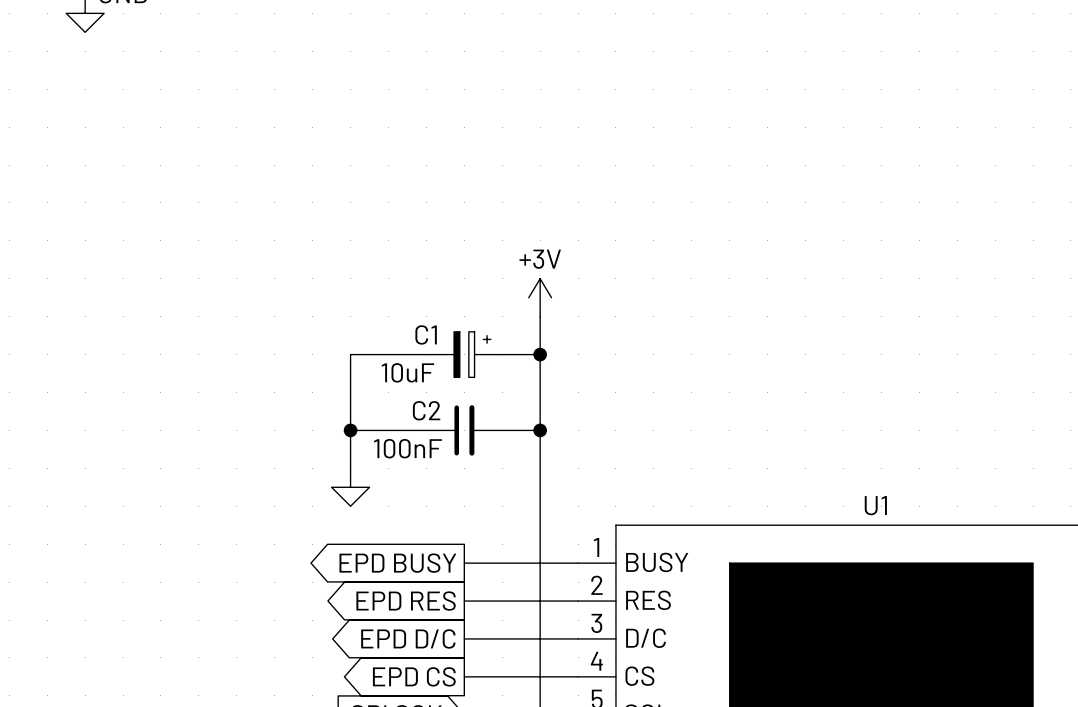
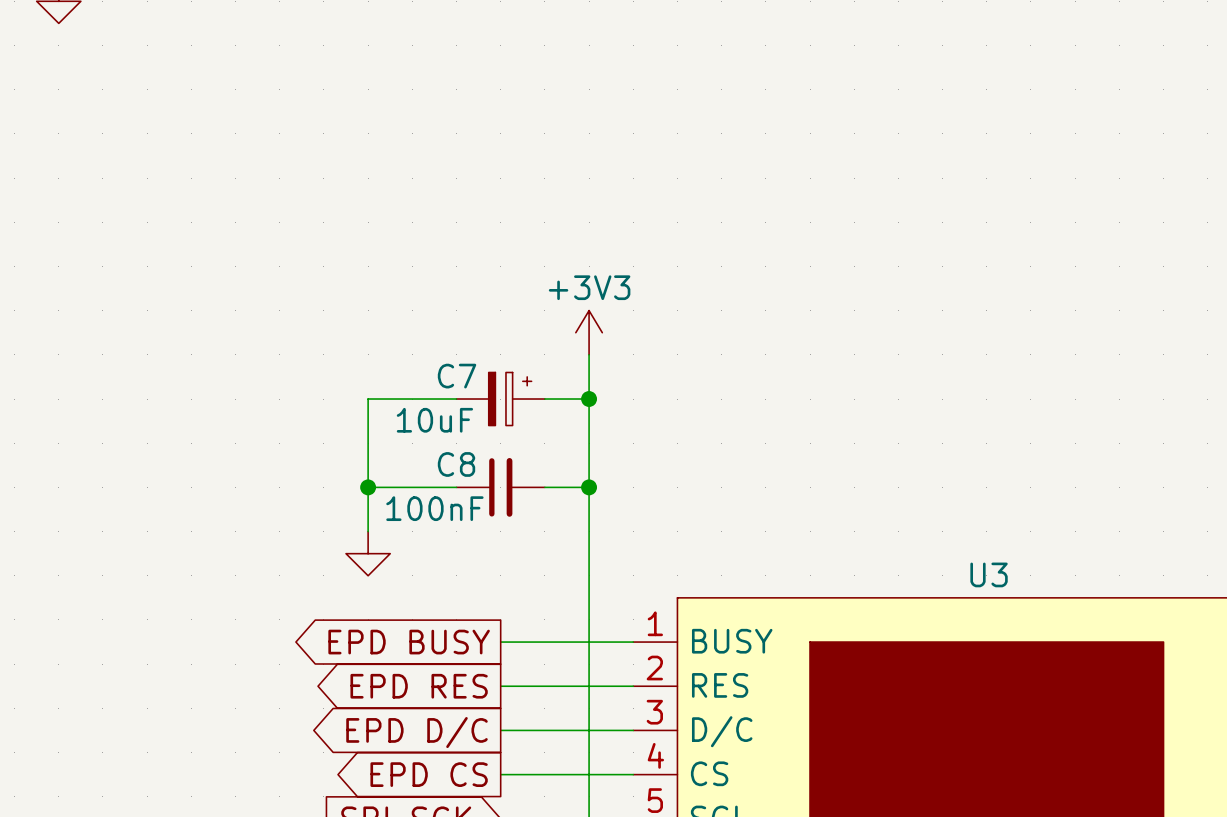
power symbol: +3V (540, 297) -> +3V3 (589, 332)
C1 name: C1 (426, 334) -> C7 (457, 376)
C2 name: C2 (426, 410) -> C8 (456, 464)
U1 name: U1 (875, 505) -> U3 (989, 574)

